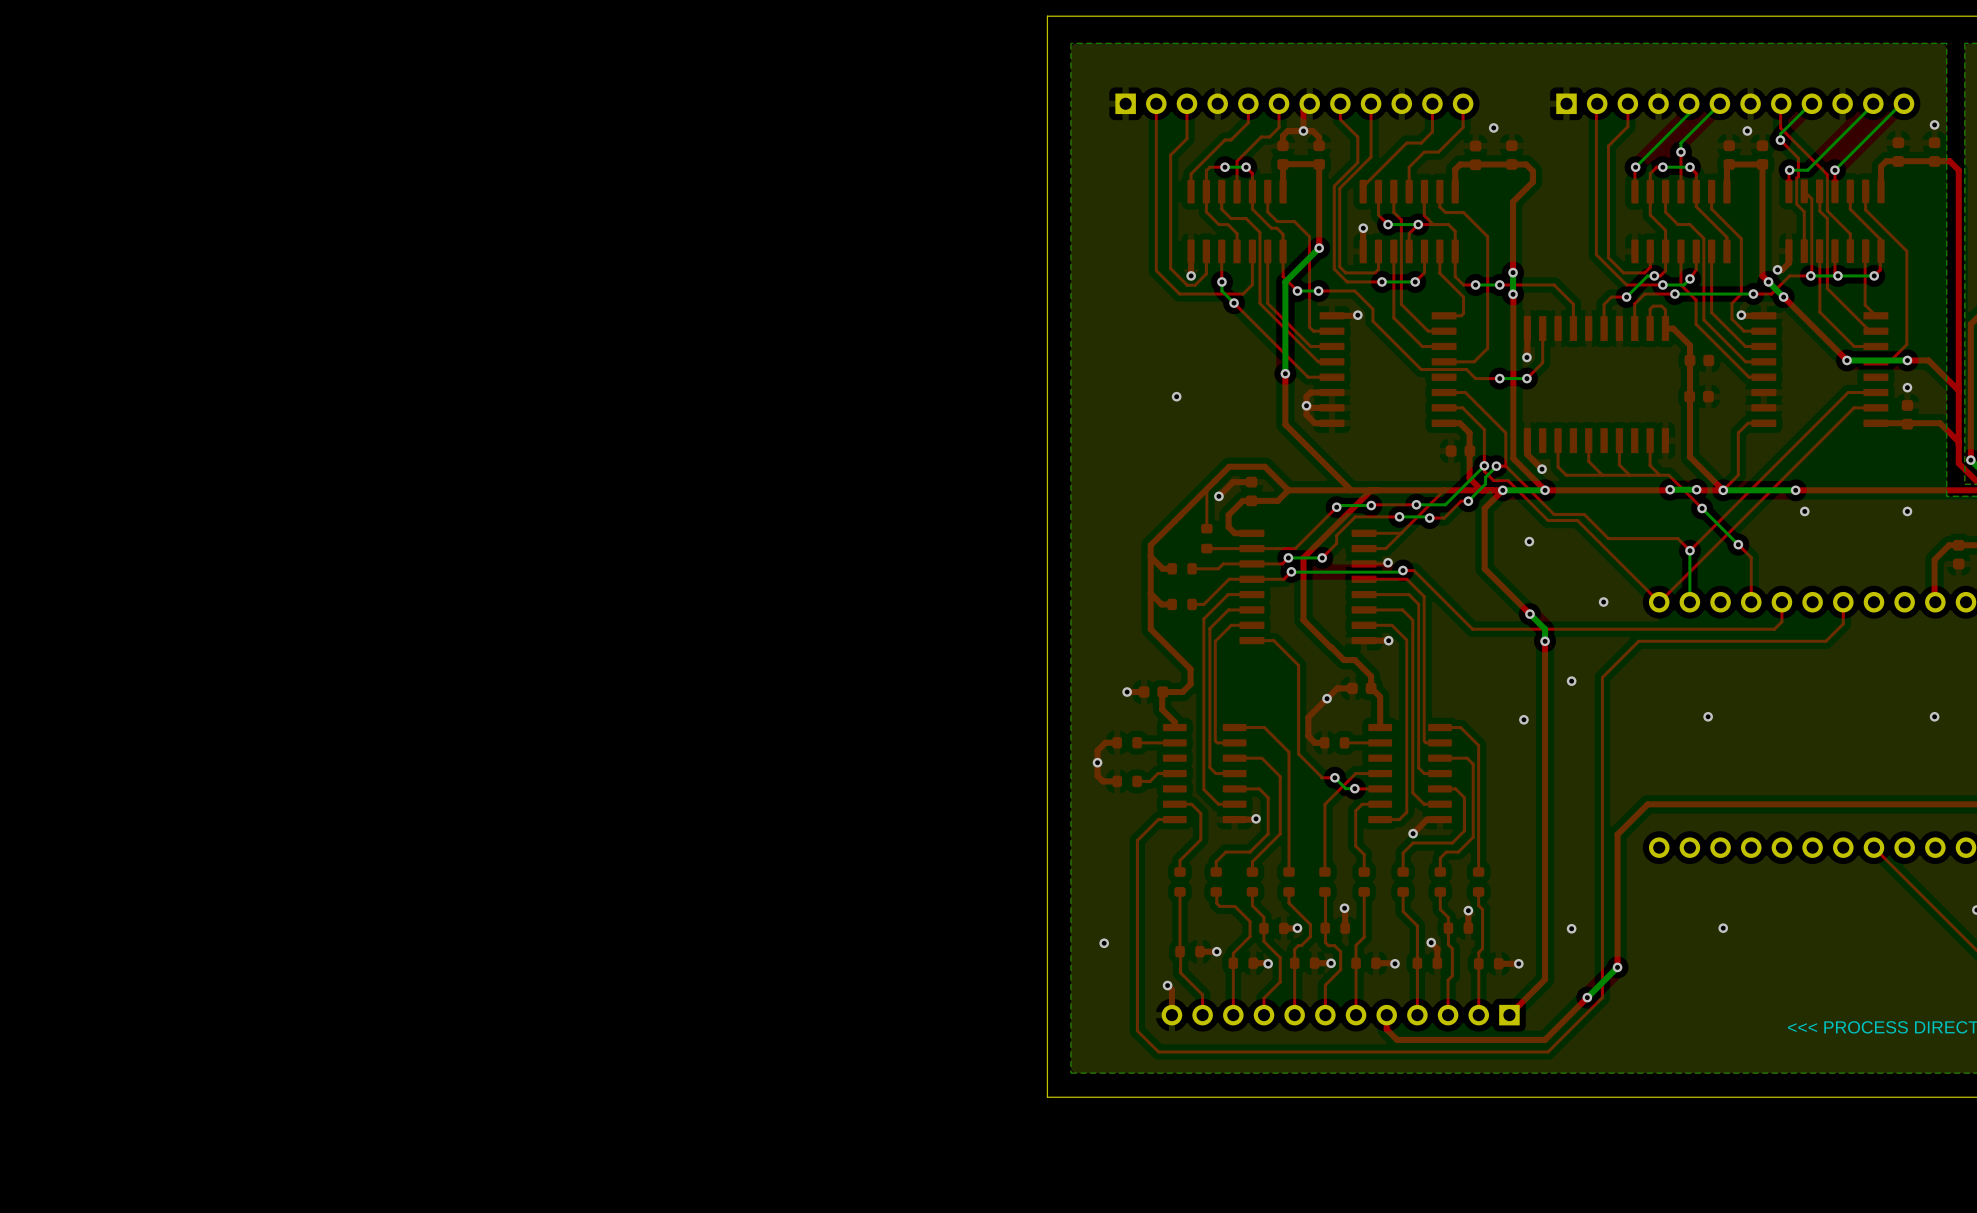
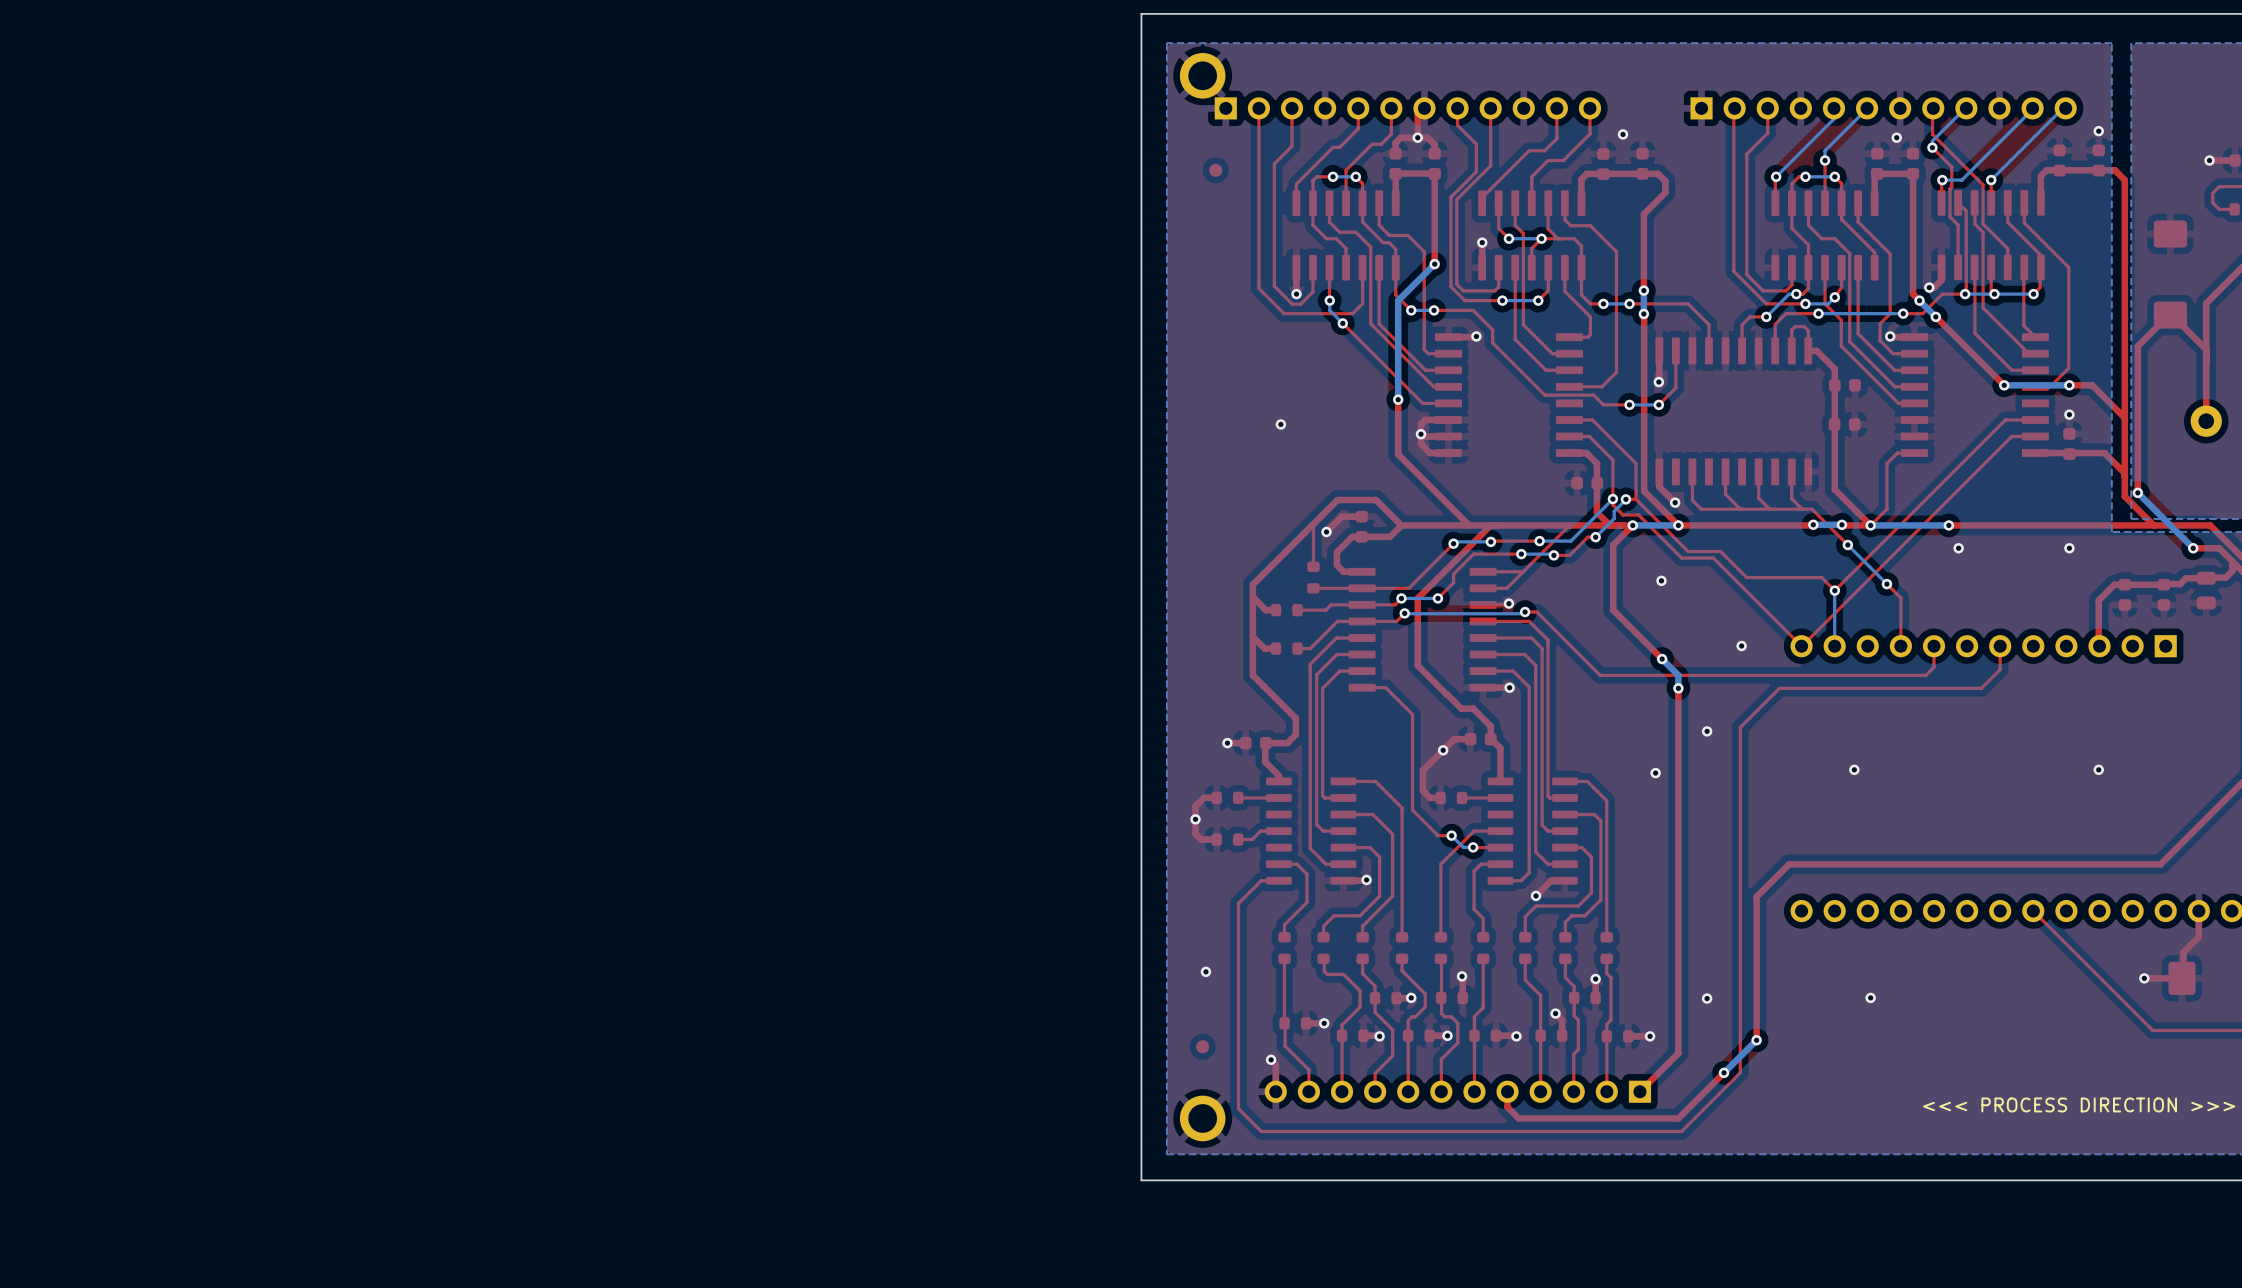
part: none -> (1202, 75)
part: none -> (1215, 170)
via position: (1104, 943) -> (1205, 971)
part: none -> (1202, 1046)
part: none -> (1202, 1118)

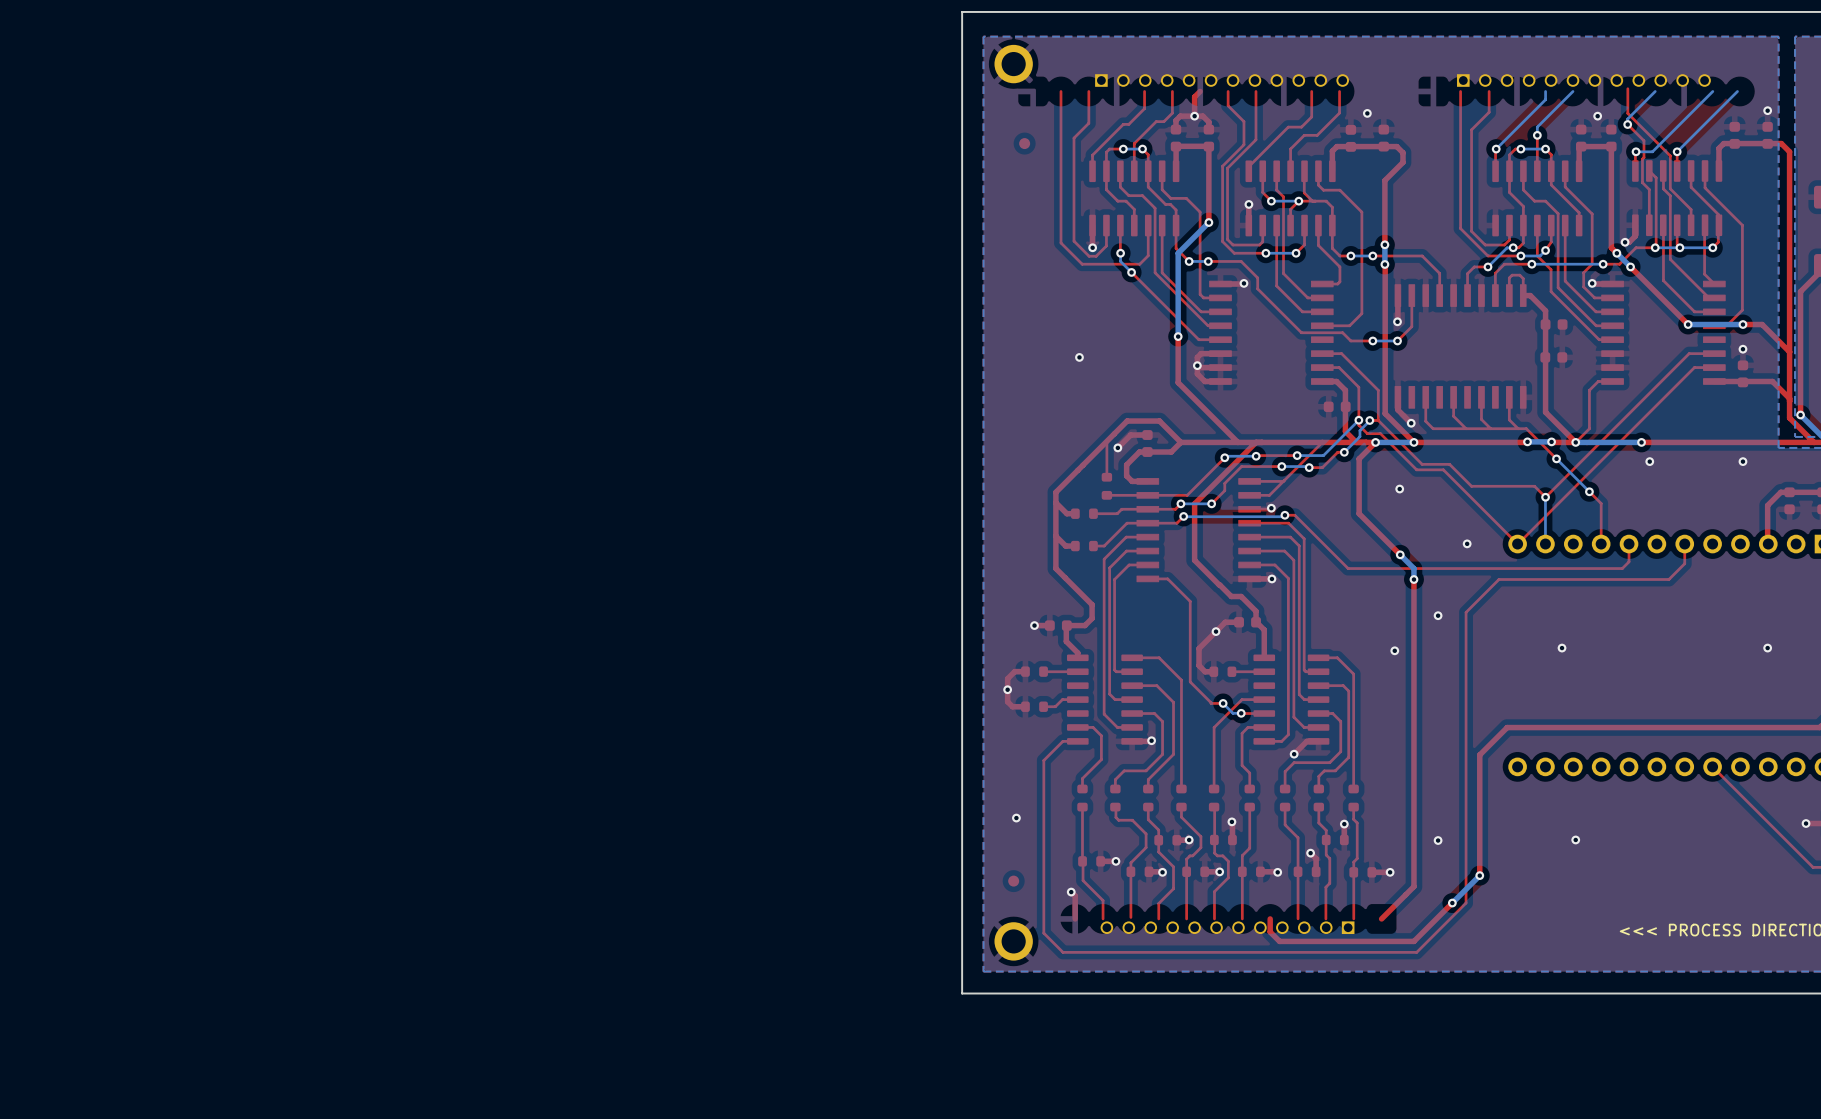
part: none -> (1222, 80)
part: none -> (1583, 80)
part: (1407, 108) -> none
part: (1883, 108) -> none
part footprint: [1264, 1080, 1652, 1103] -> [1100, 921, 1355, 935]

